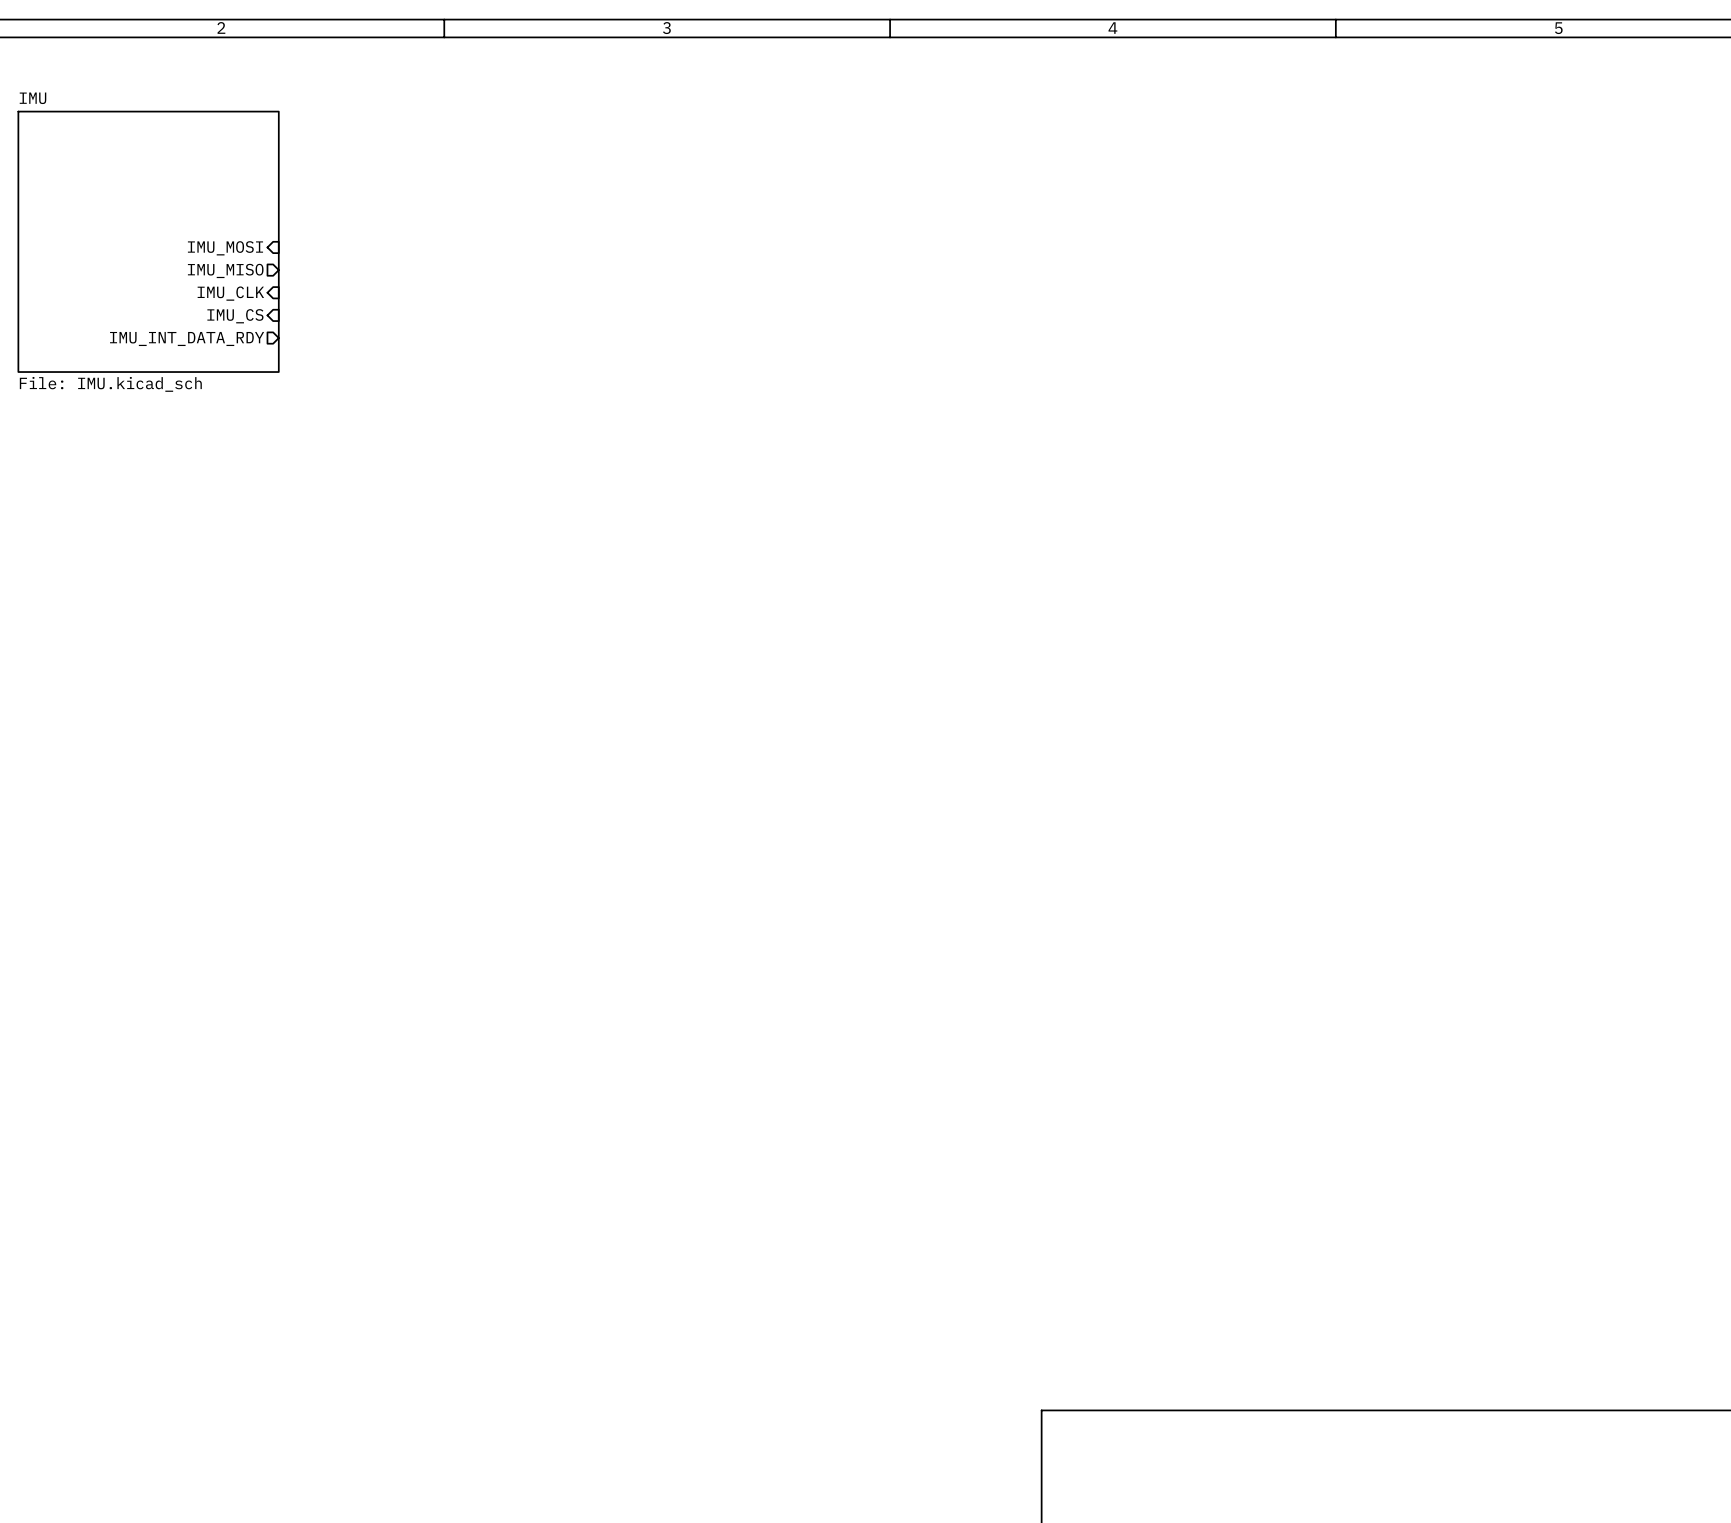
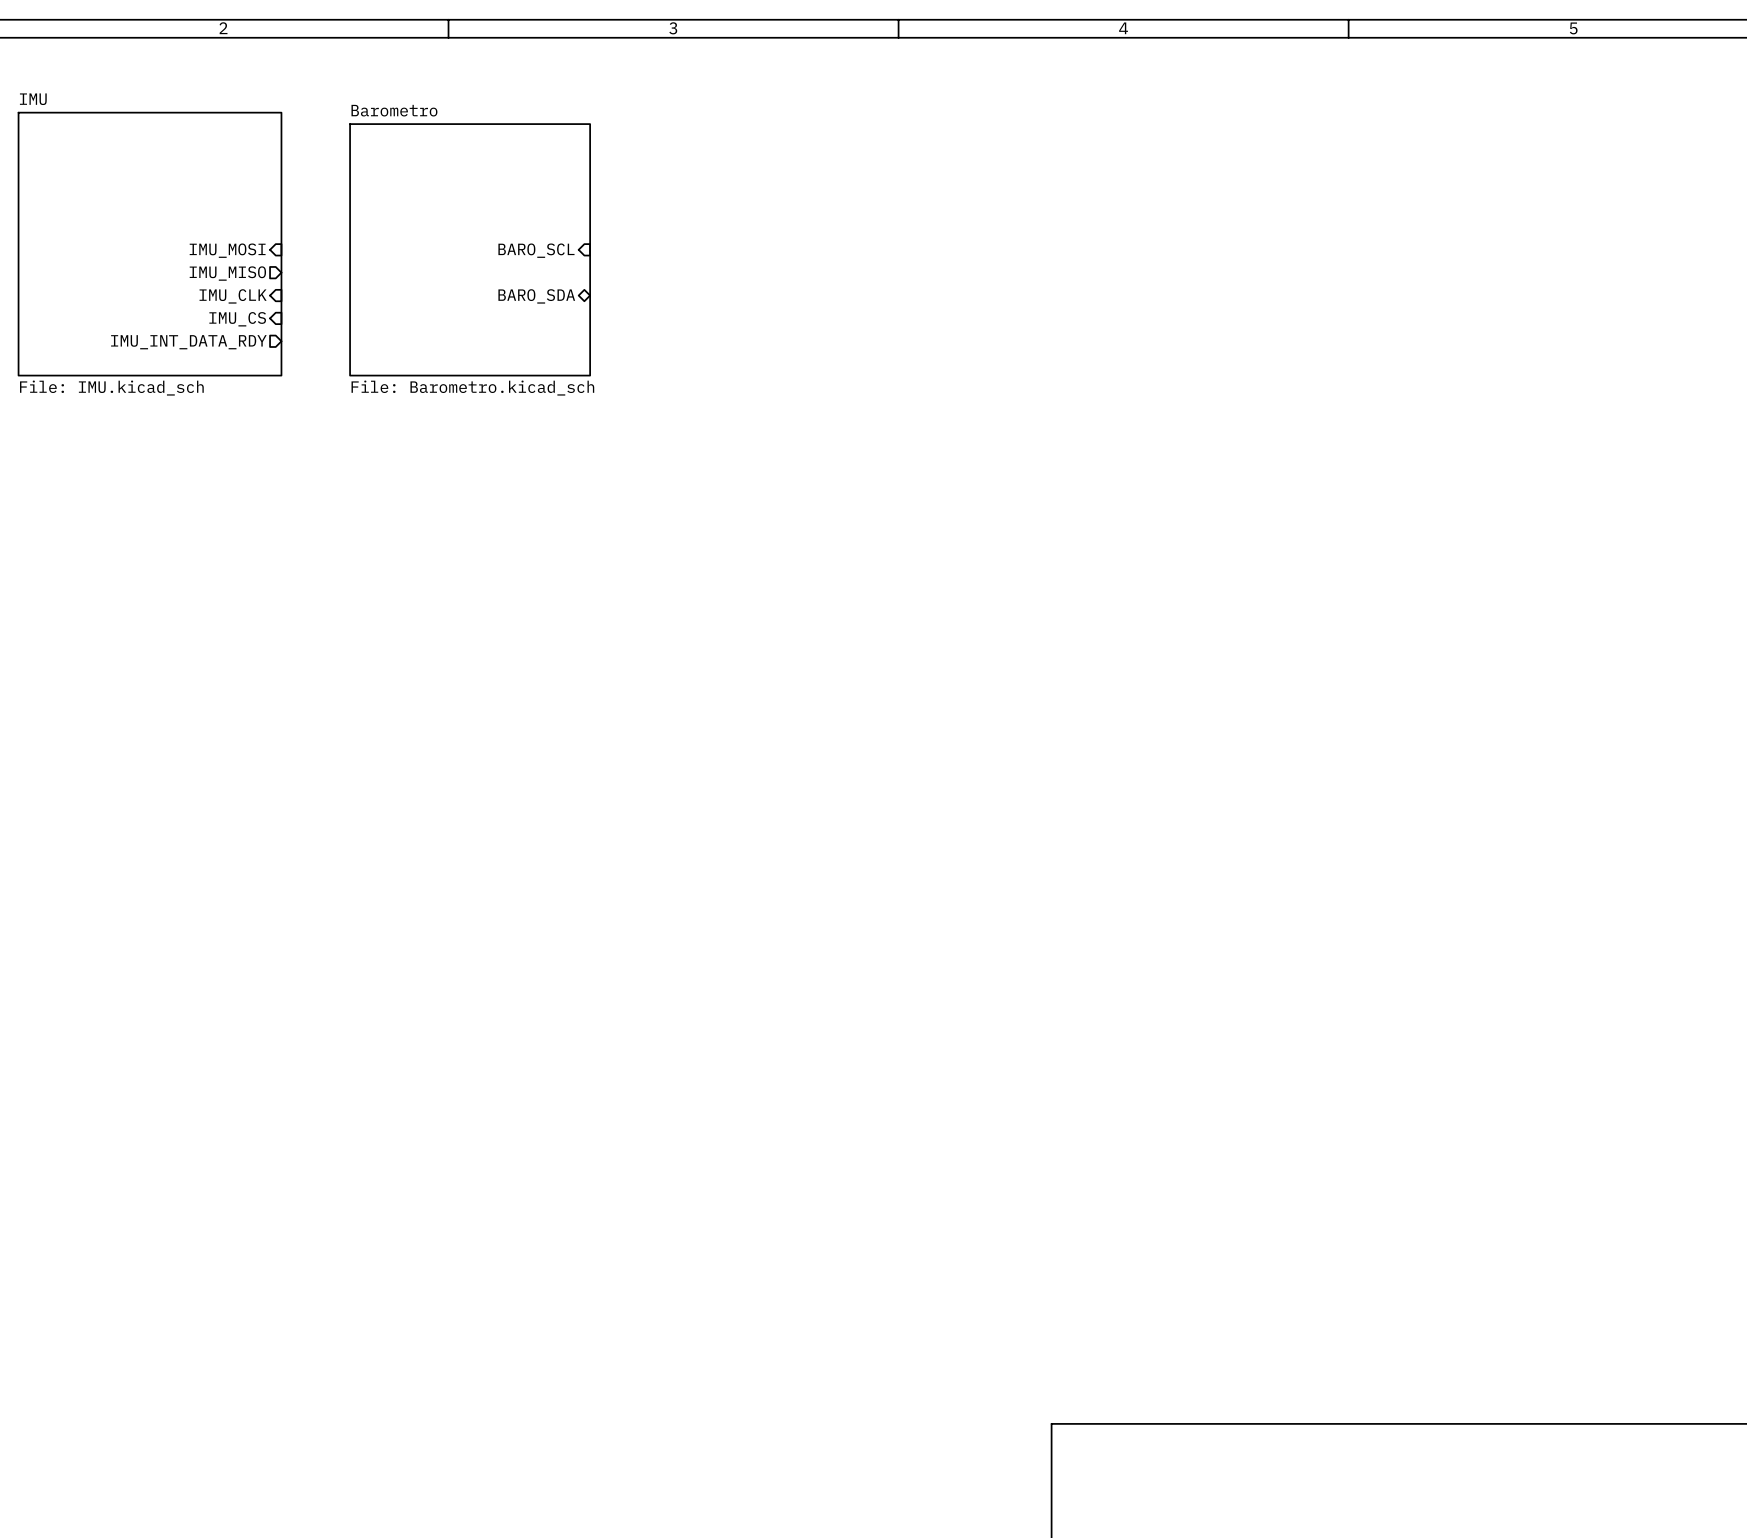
sheet Barometro: none -> File: Barometro.kicad_sch (470, 249)
sheet pin: none -> BARO_SCL (536, 250)
sheet pin: none -> BARO_SDA (536, 296)

